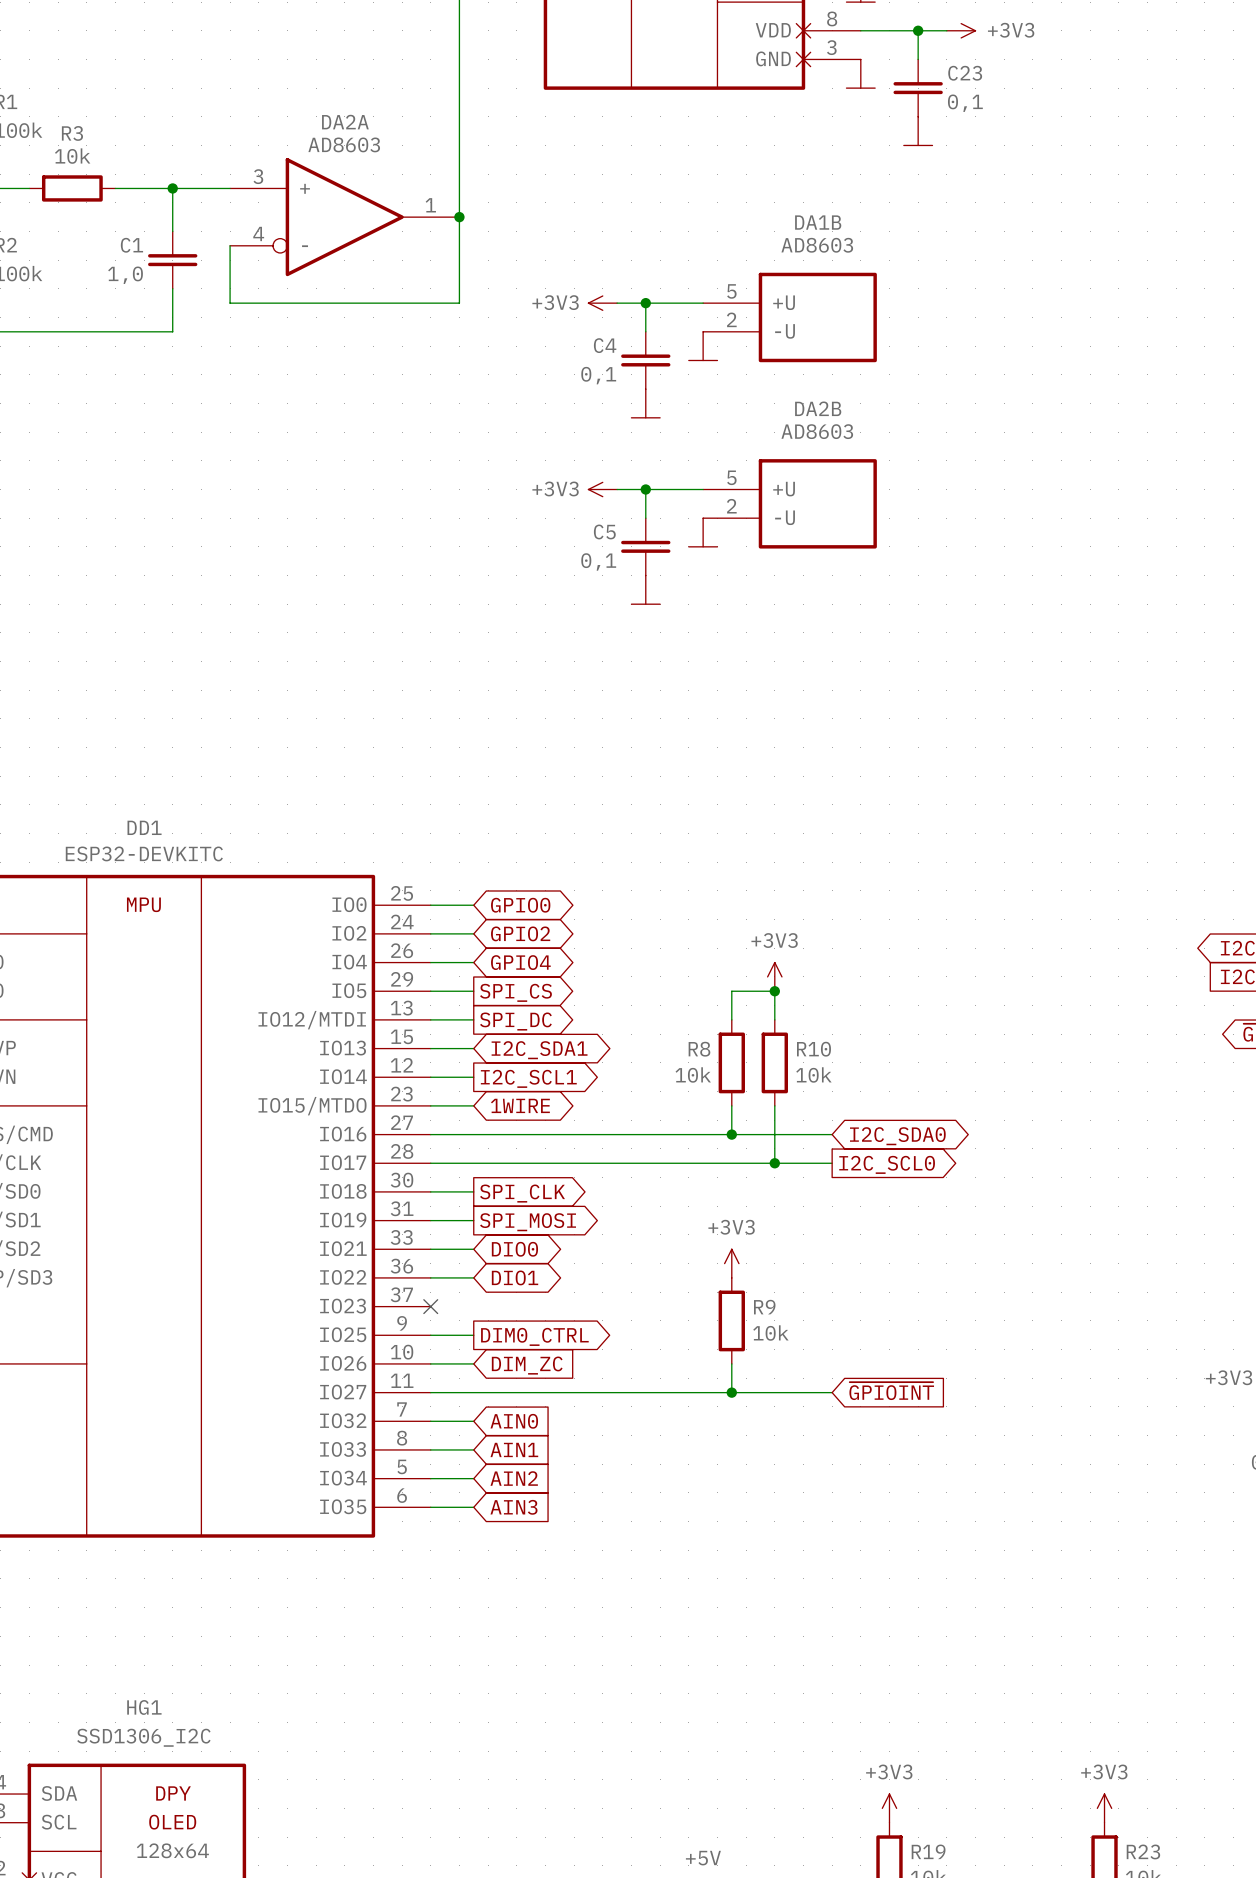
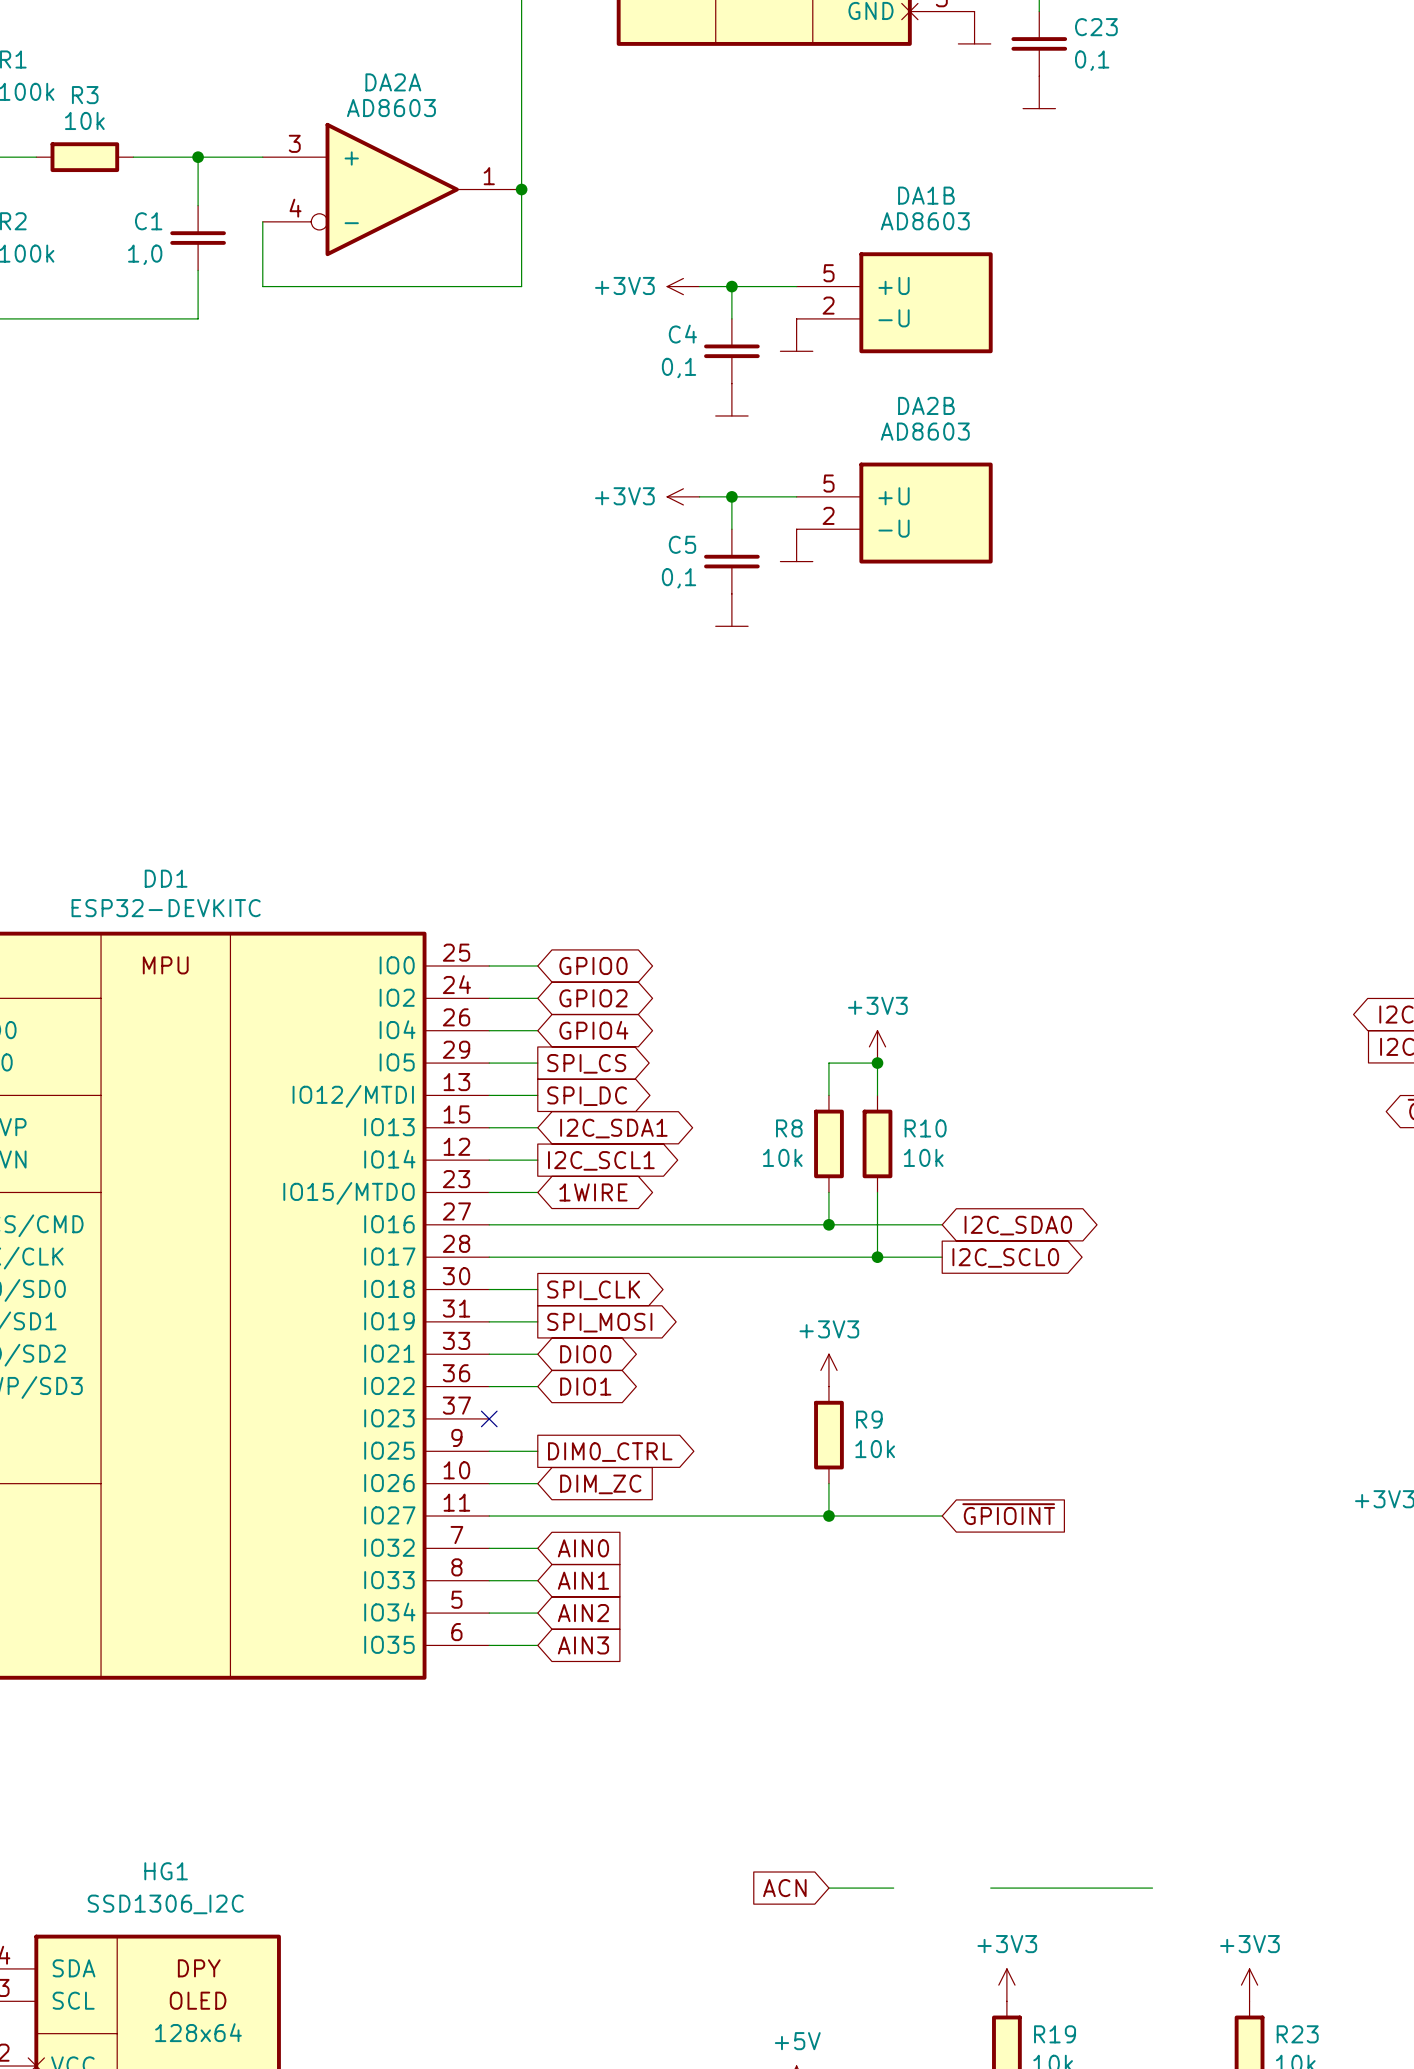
global label: none -> ACN (784, 1888)
wire: none -> (828, 1888) (893, 1888)
wire: none -> (990, 1888) (1152, 1888)

